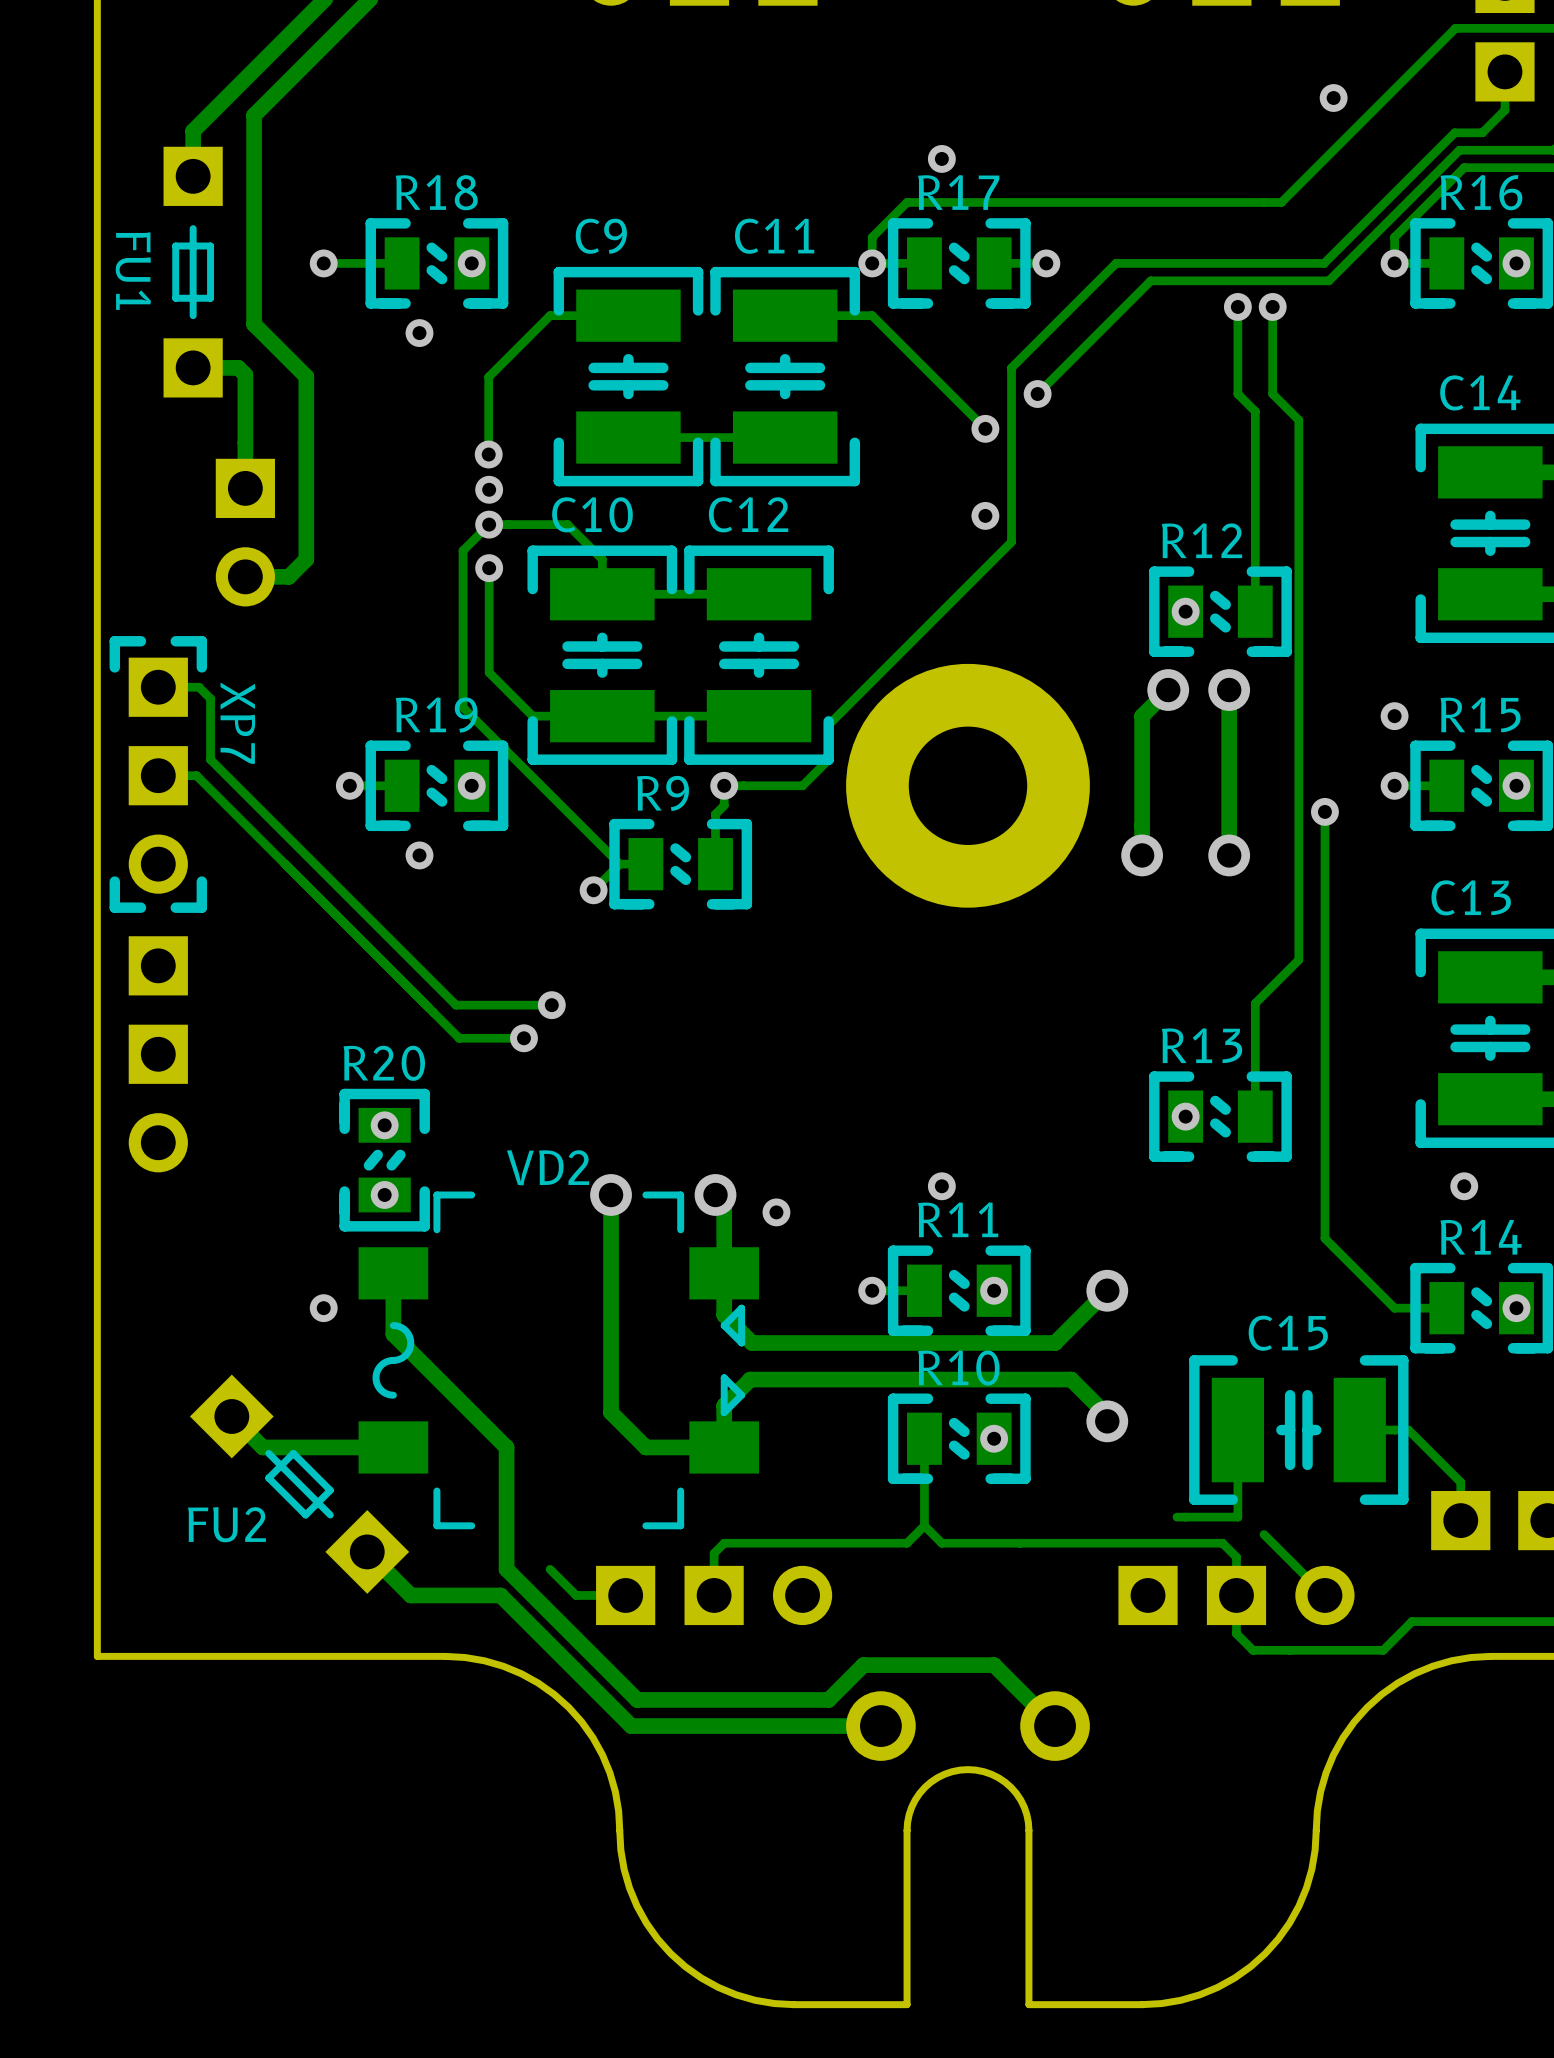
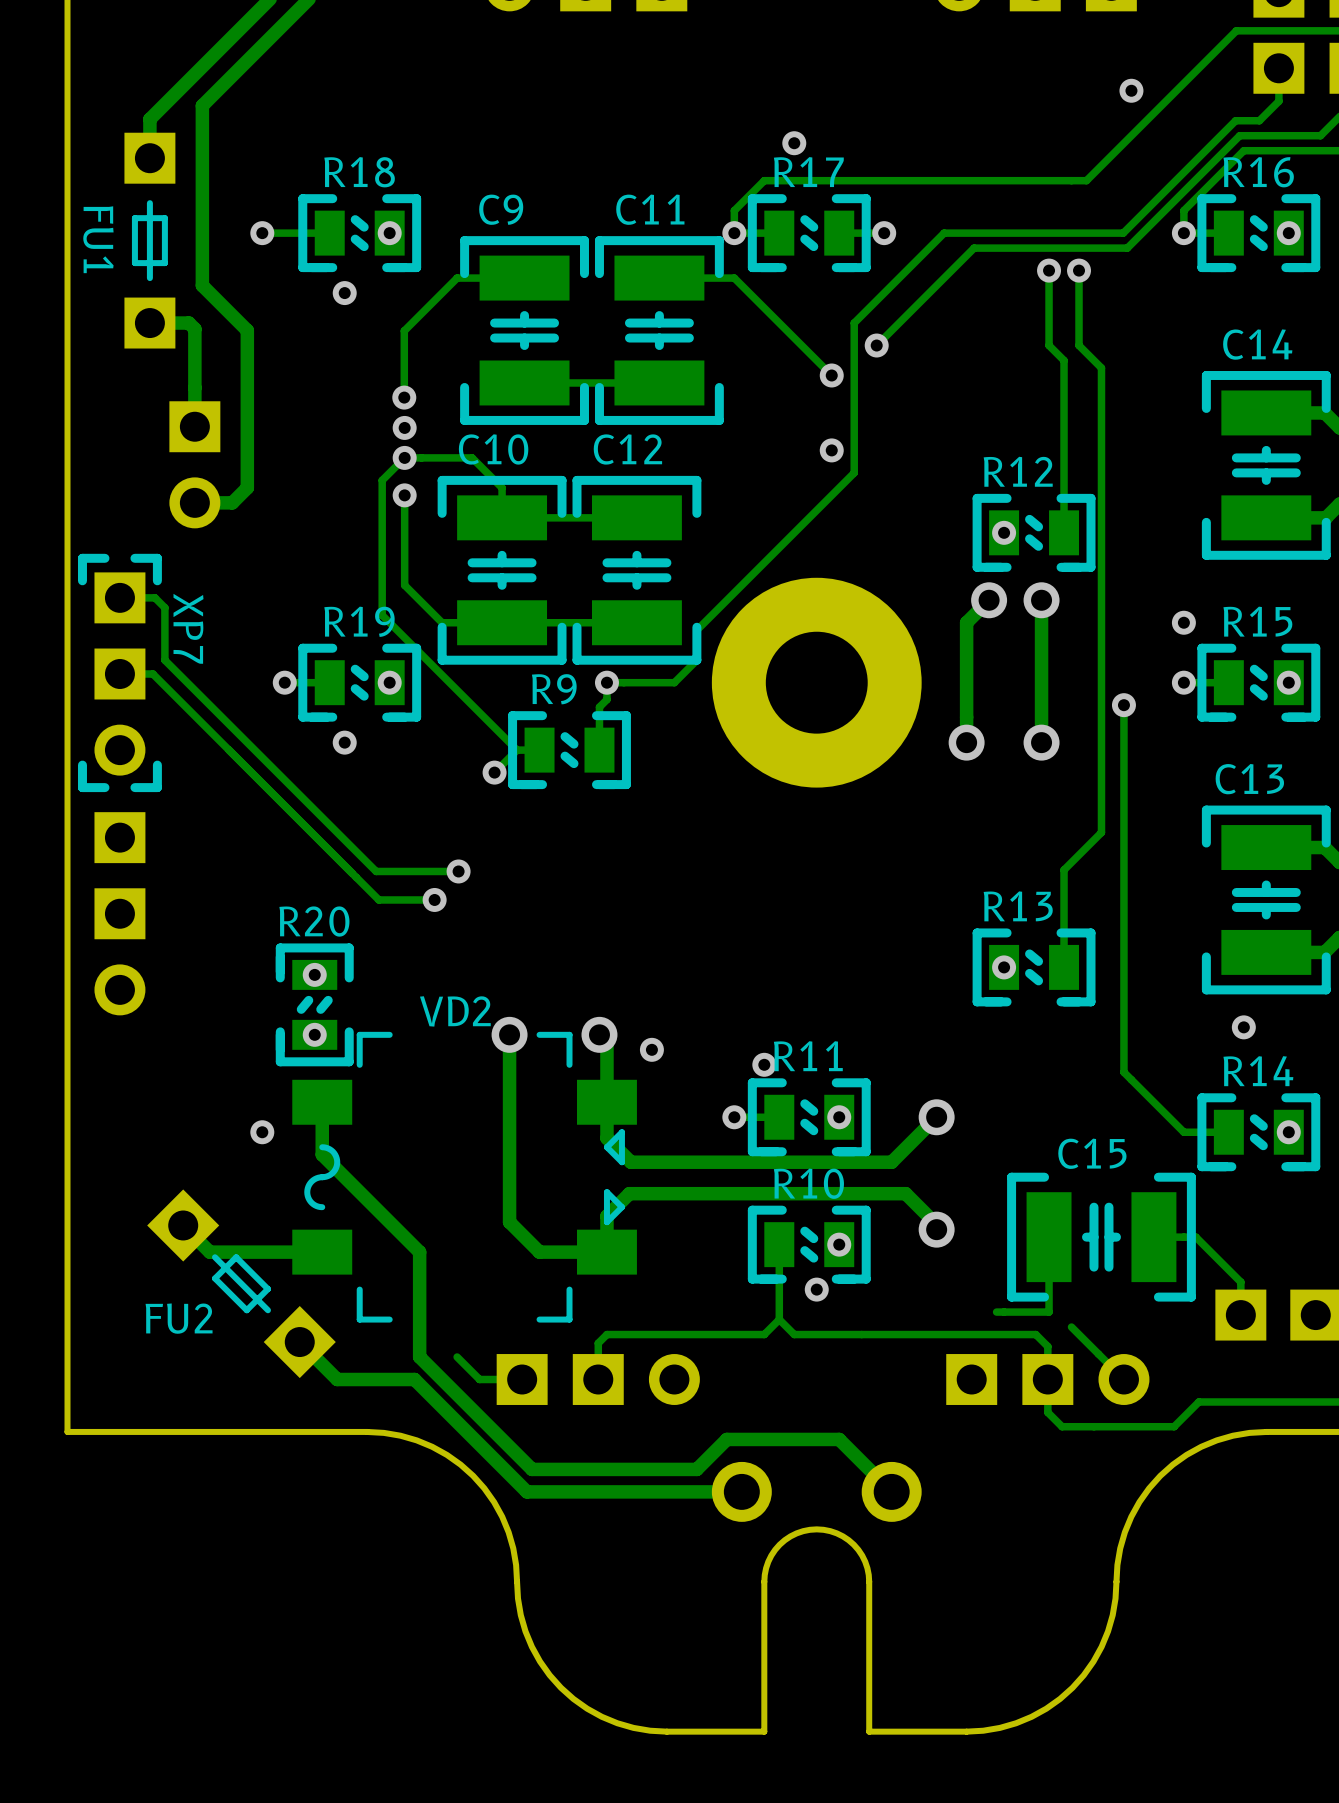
via position: (941, 1186) -> (764, 1064)
via: none -> (816, 1289)

